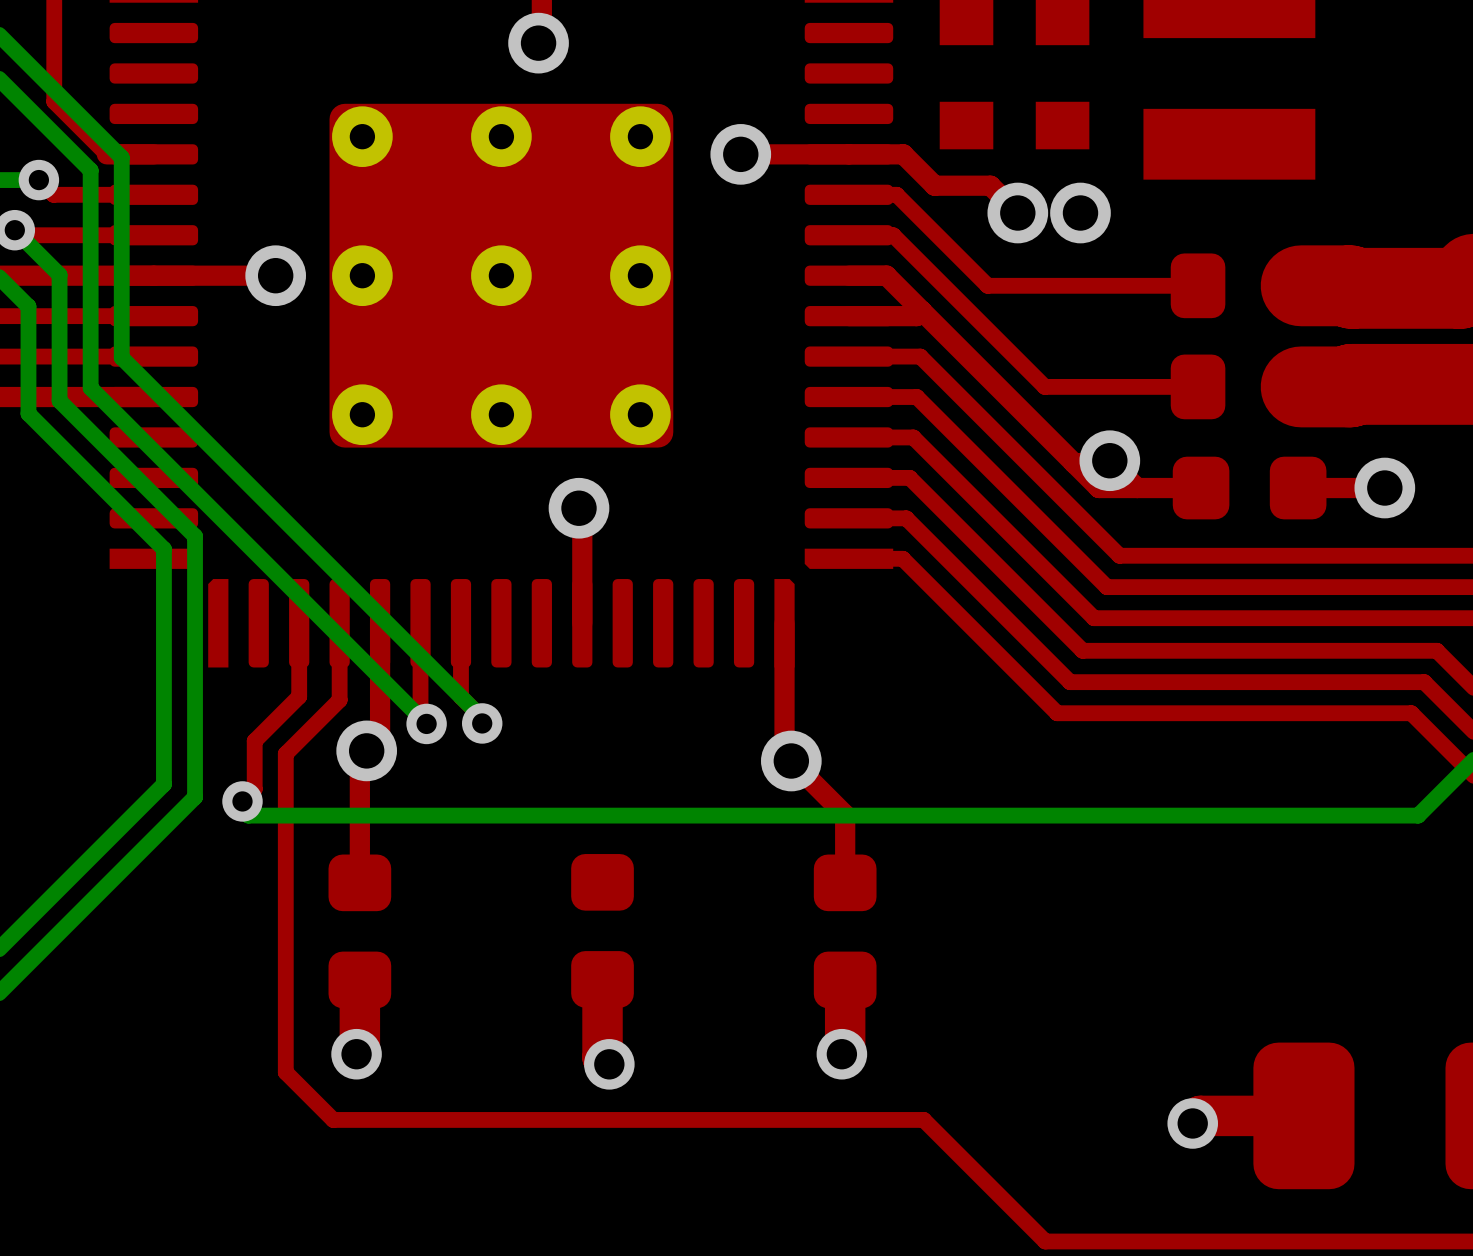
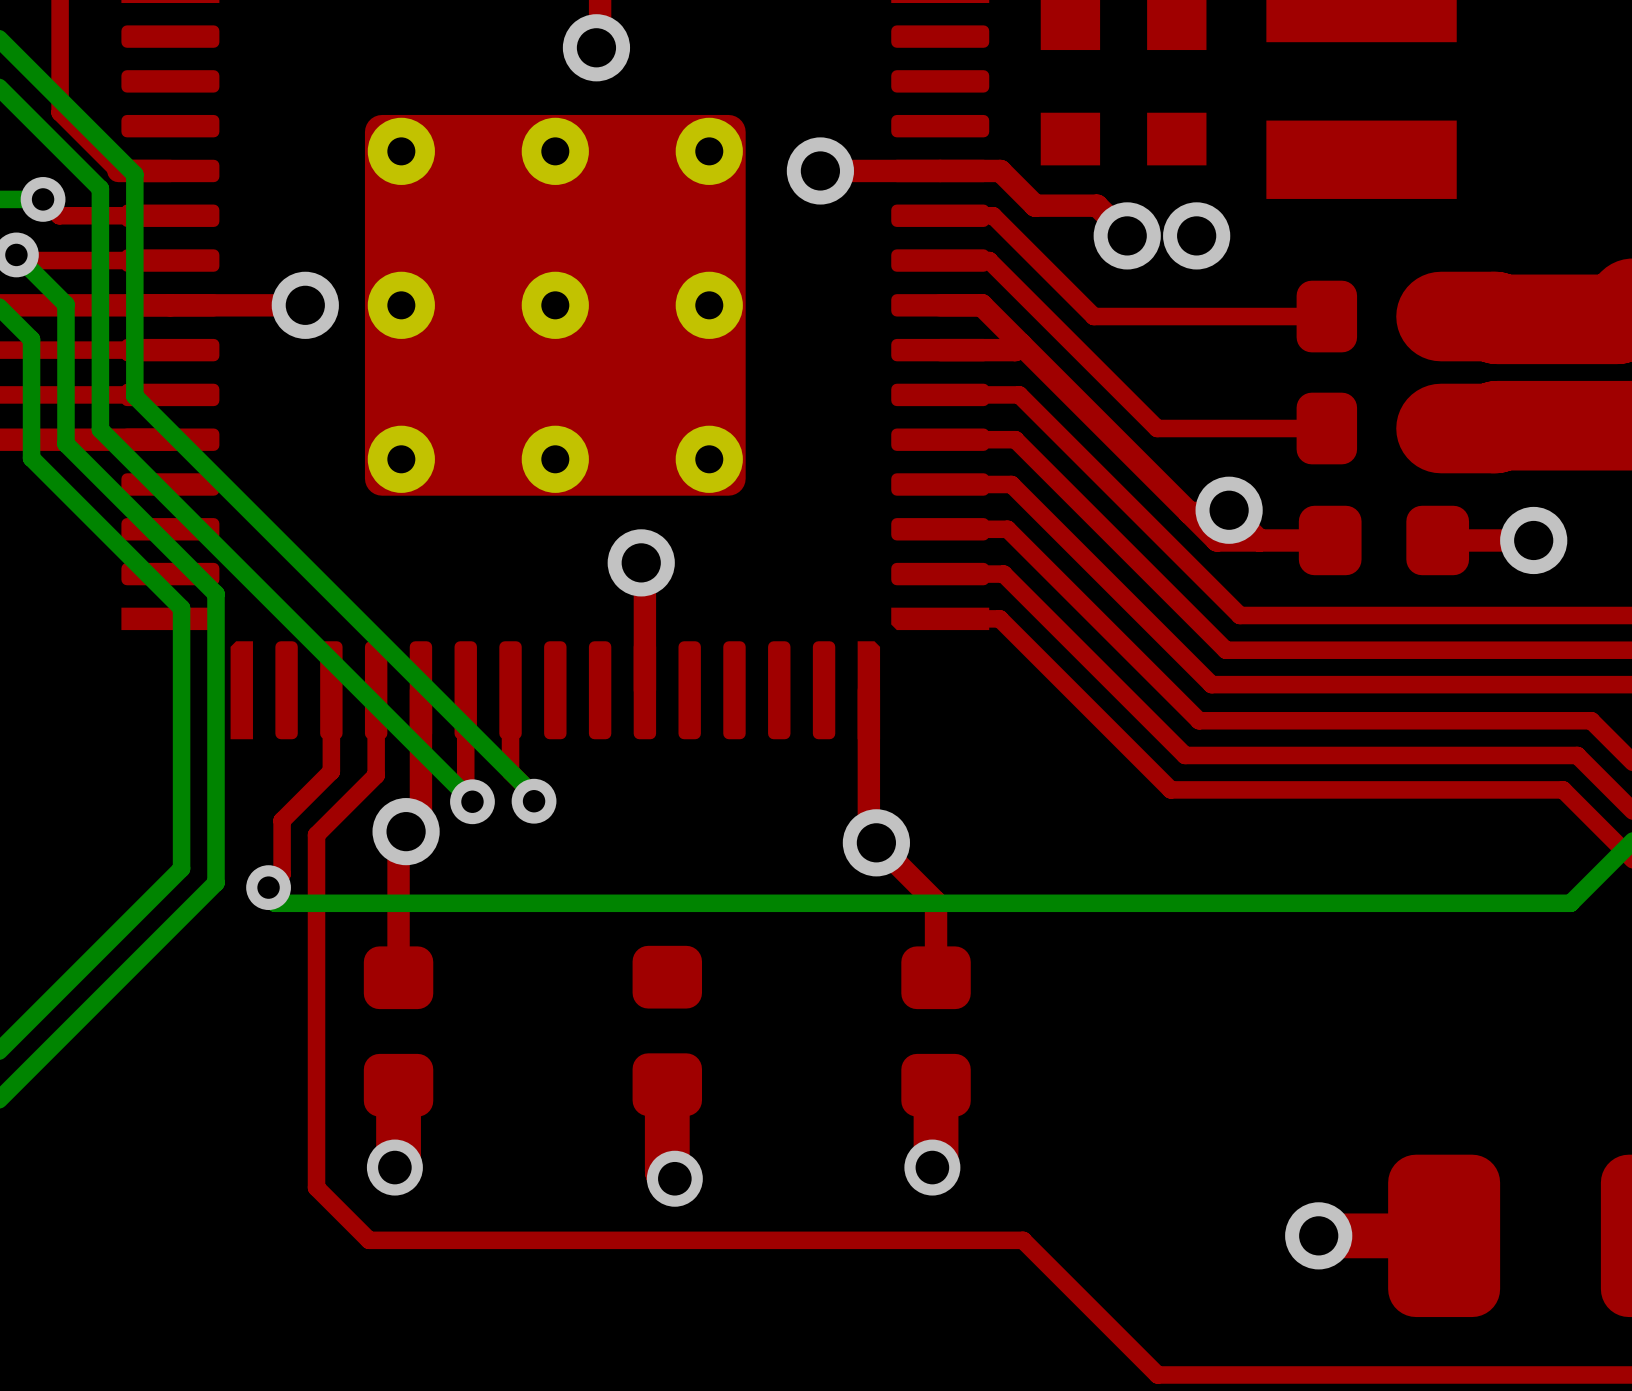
via size: [1167, 1098, 1219, 1149] -> [1285, 1202, 1353, 1270]

